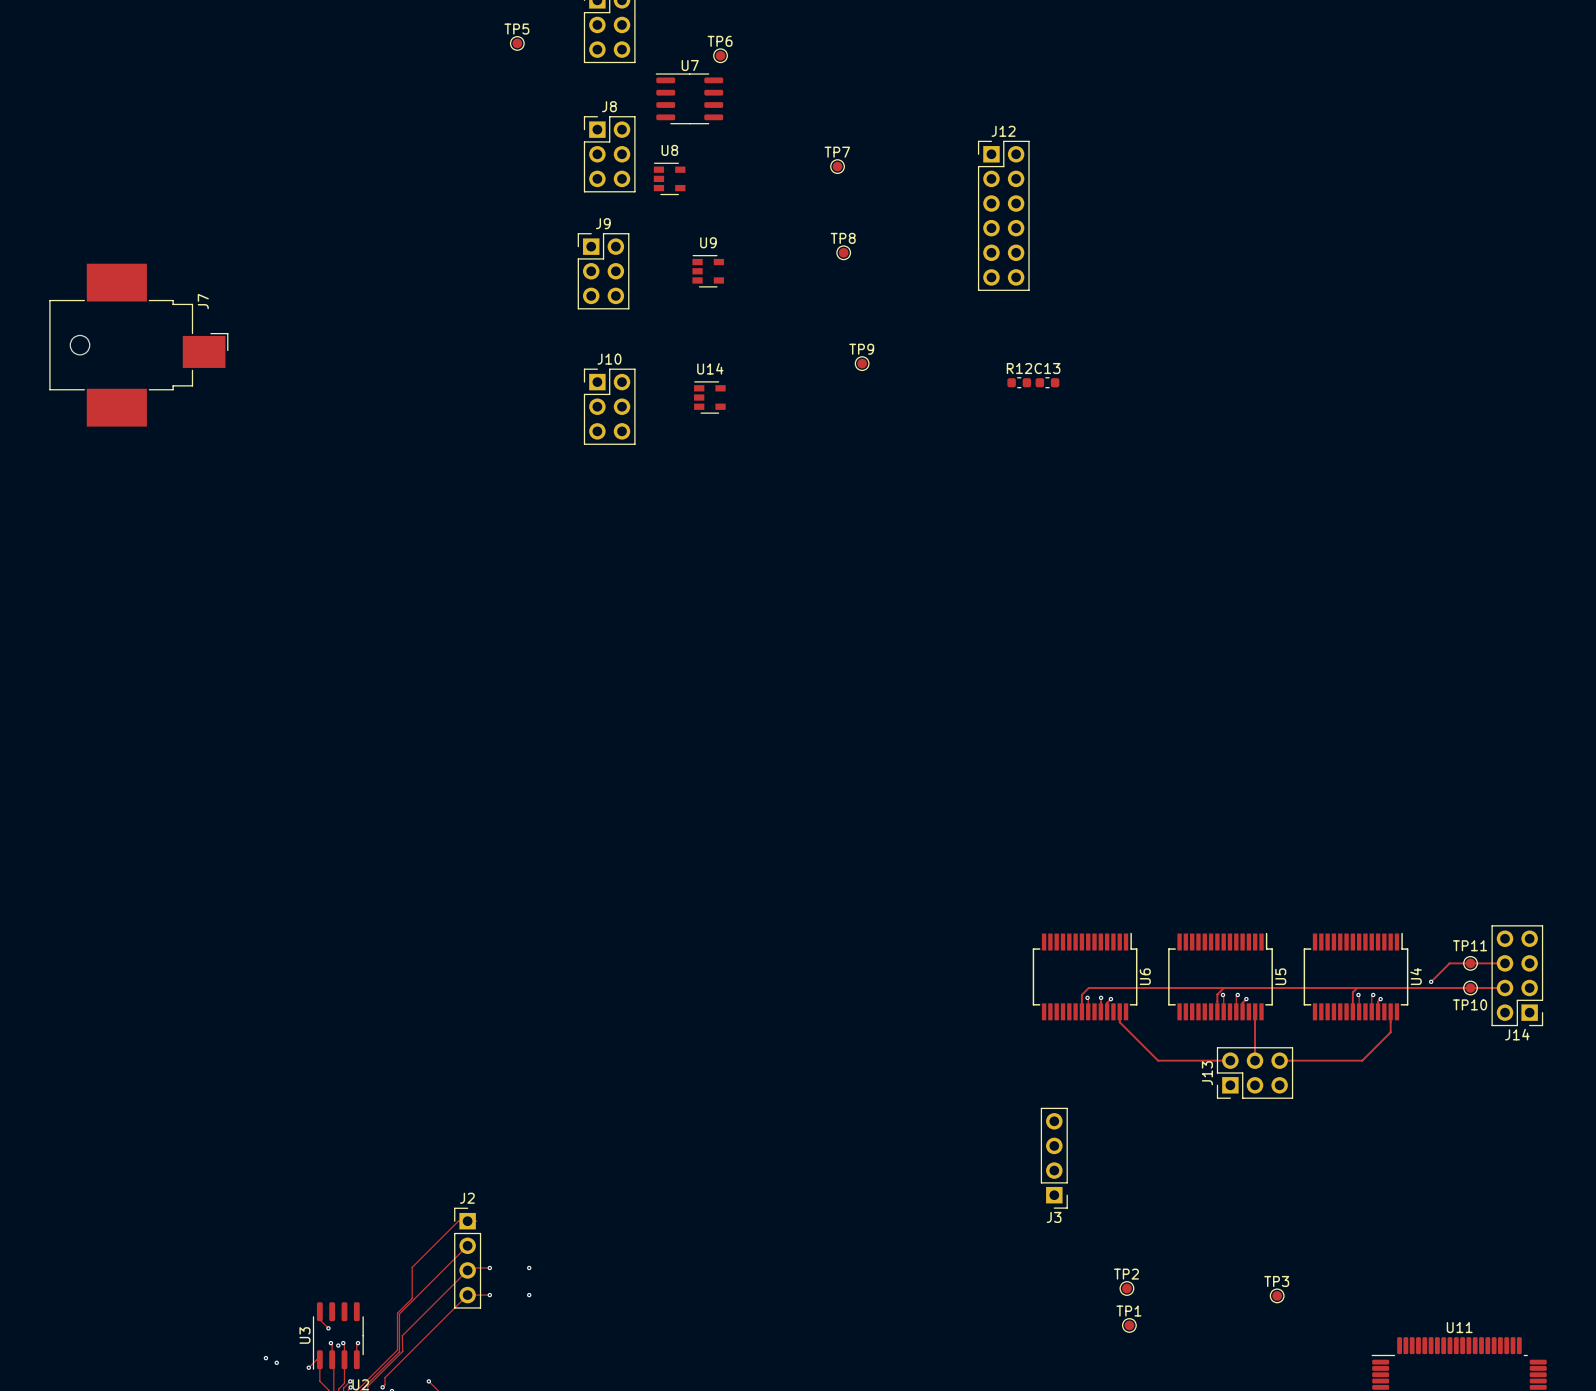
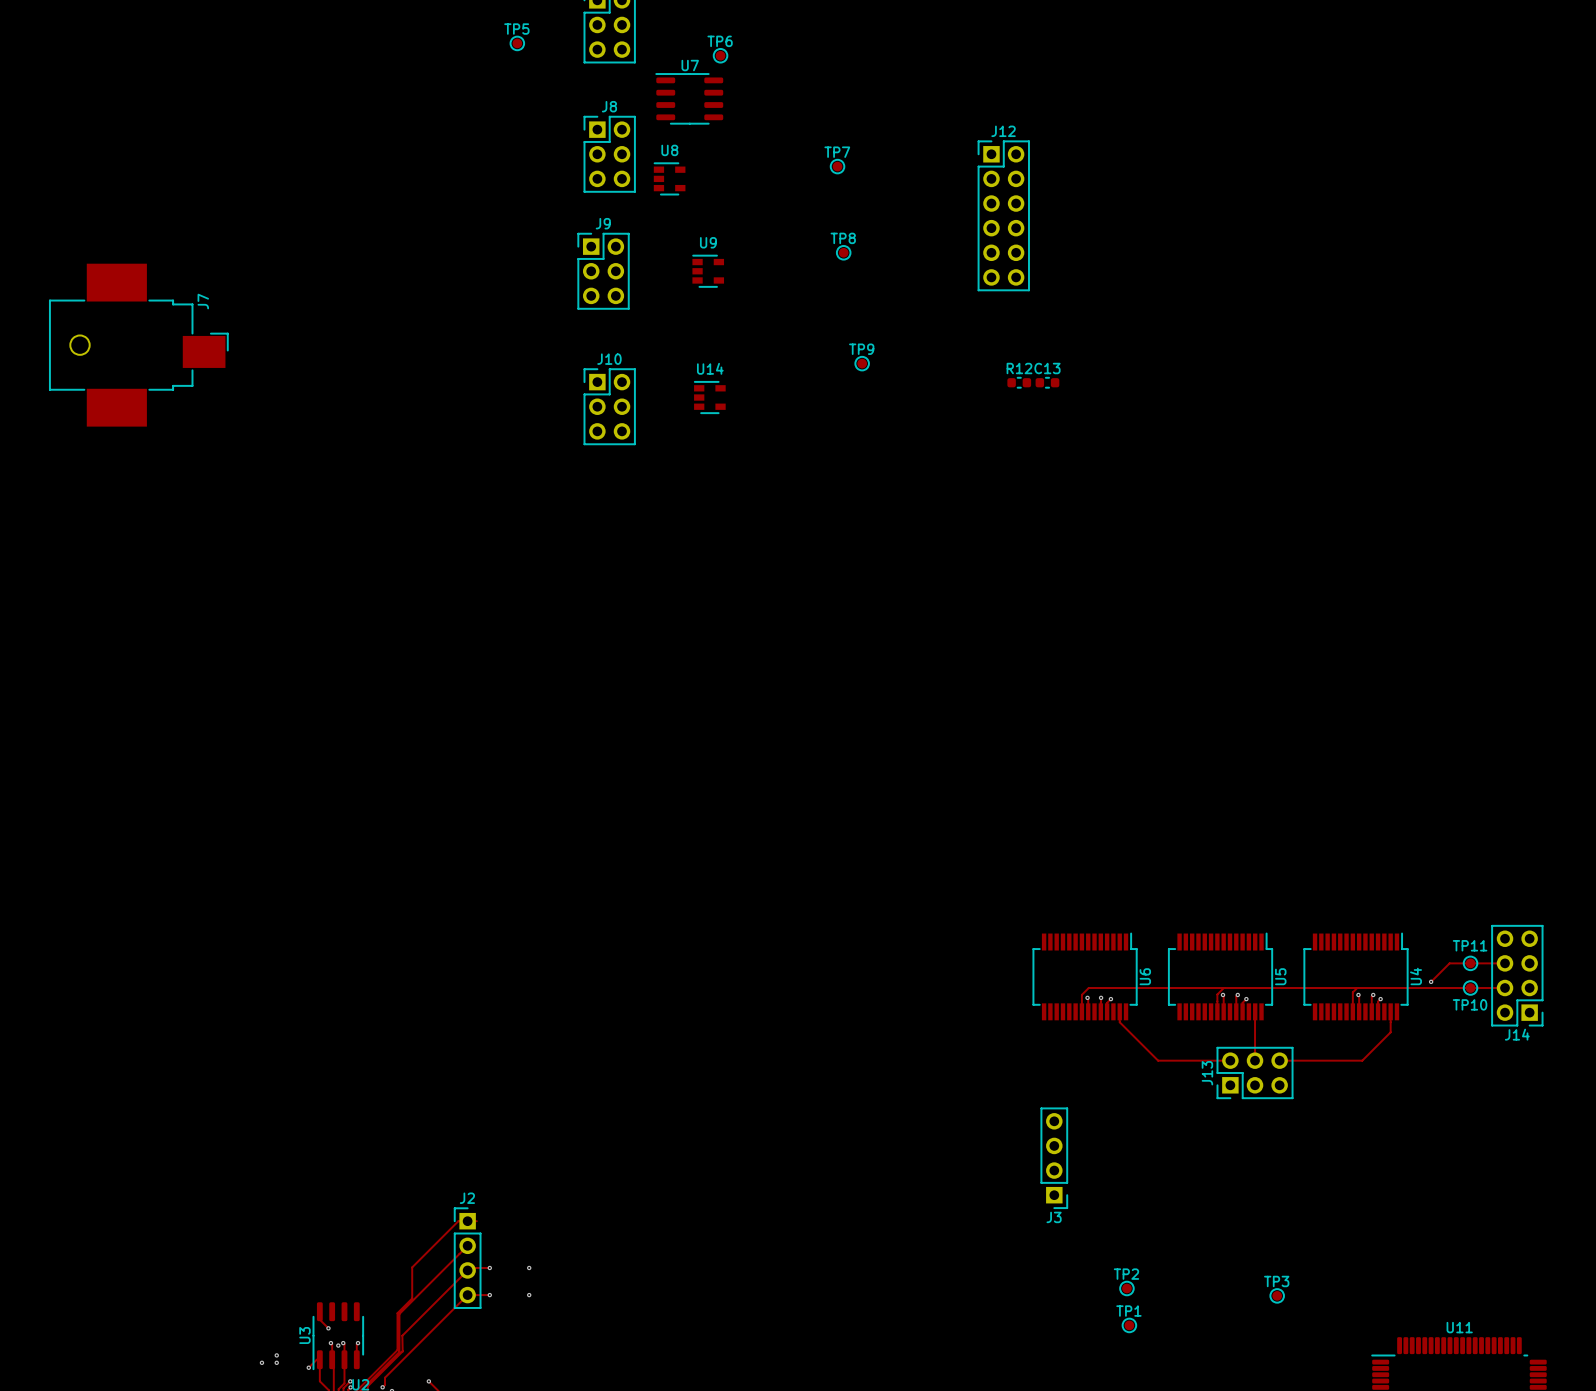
via: none -> (276, 1355)
via: (265, 1358) -> none
via: none -> (261, 1362)

